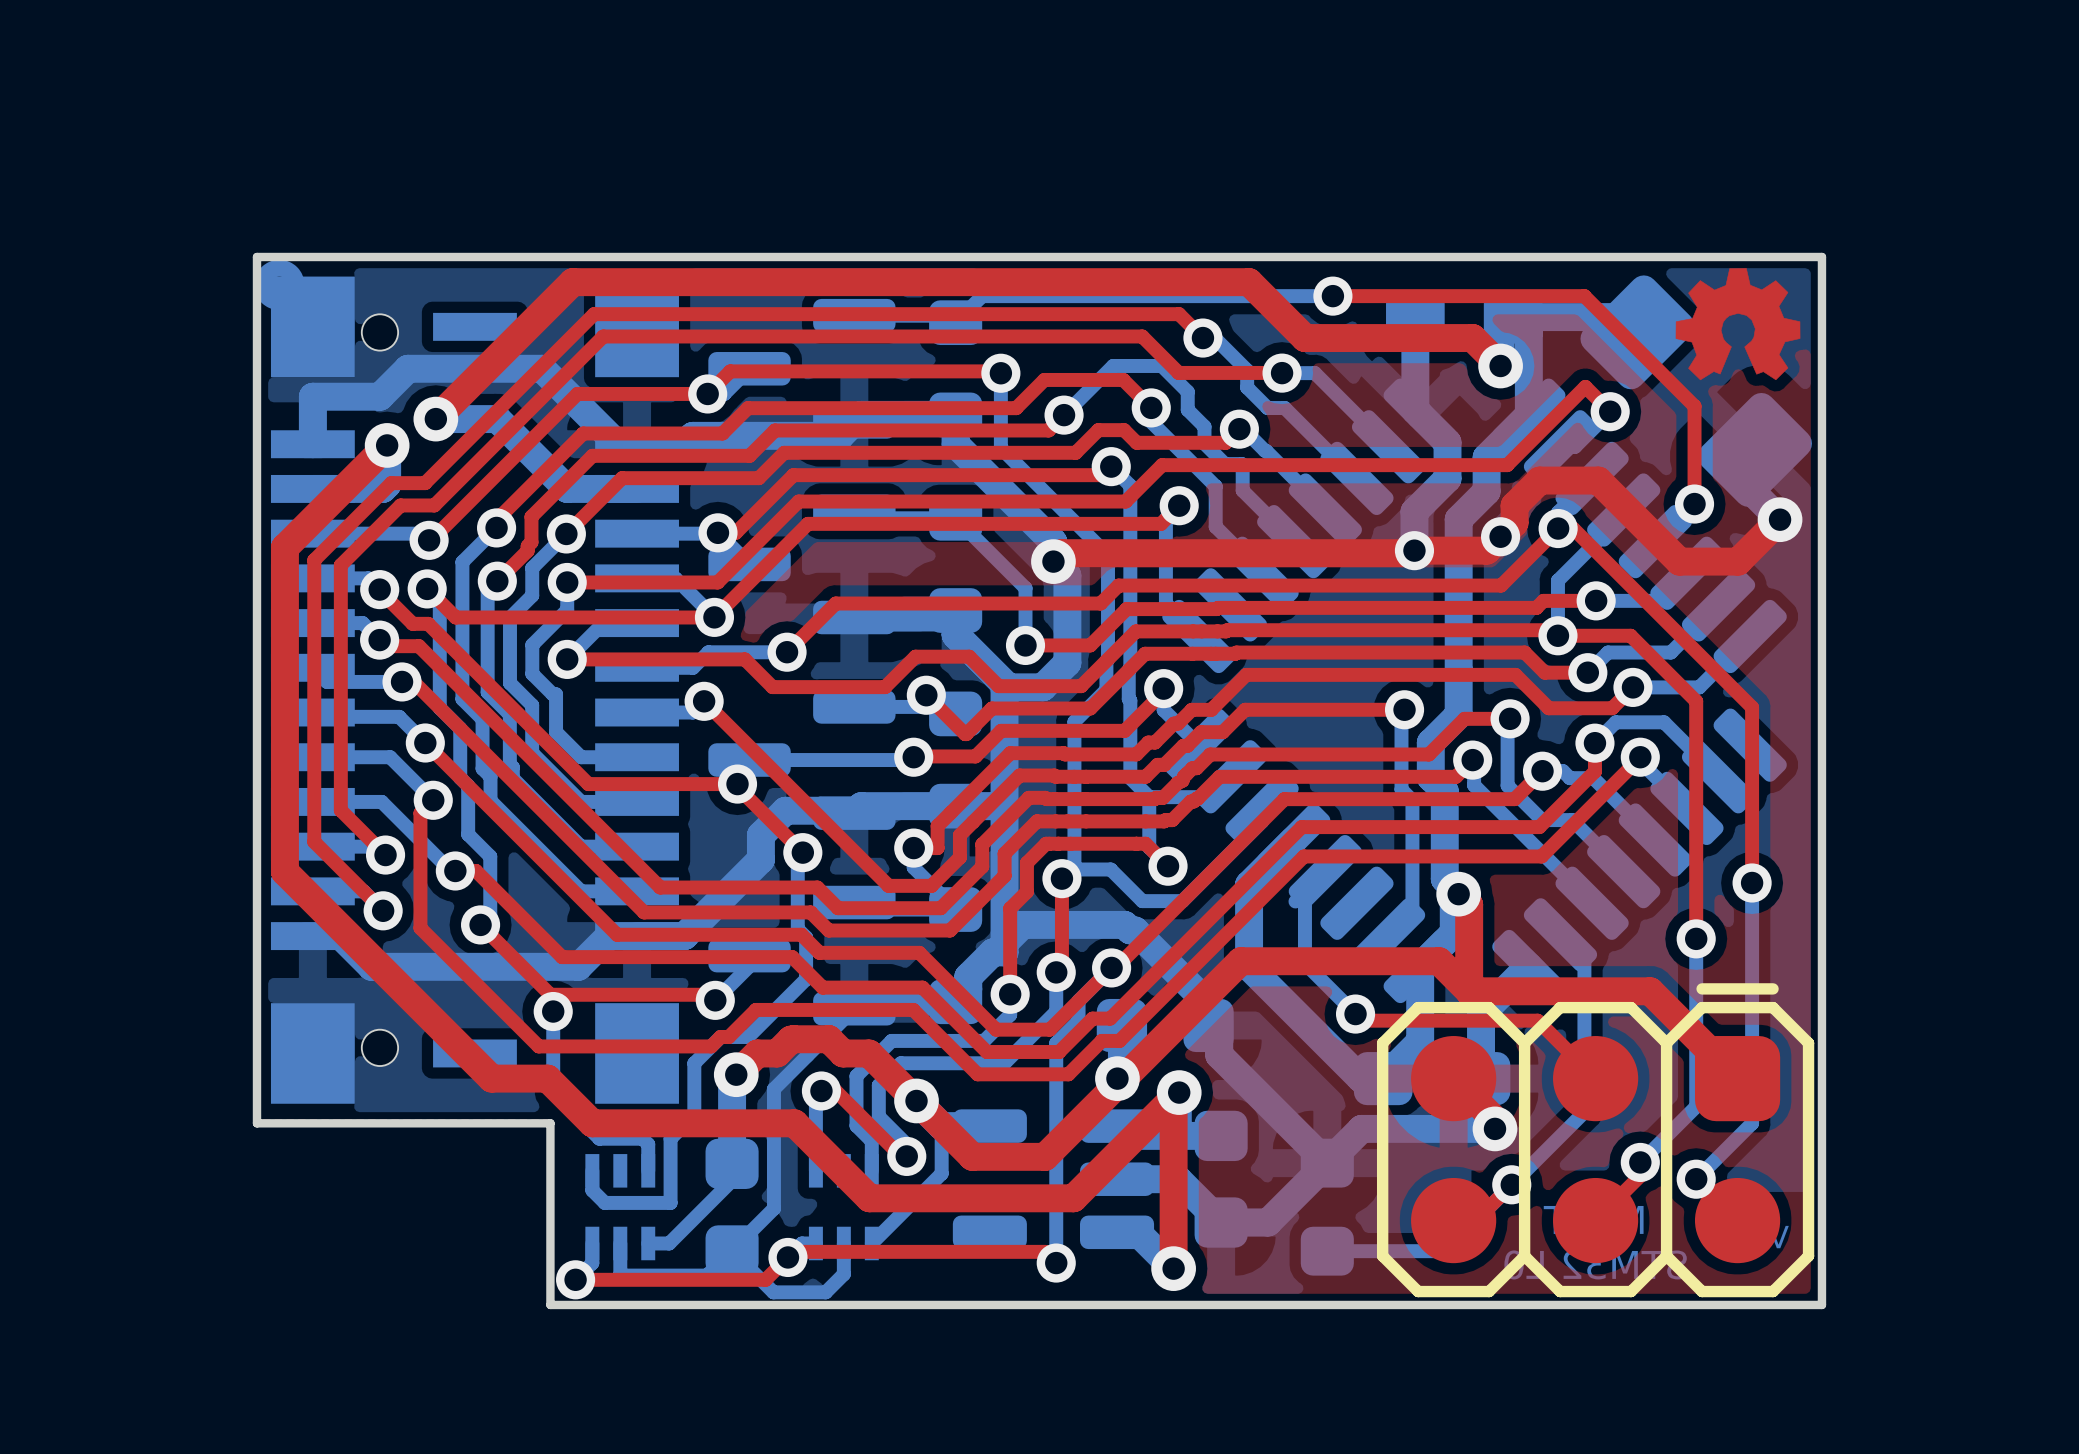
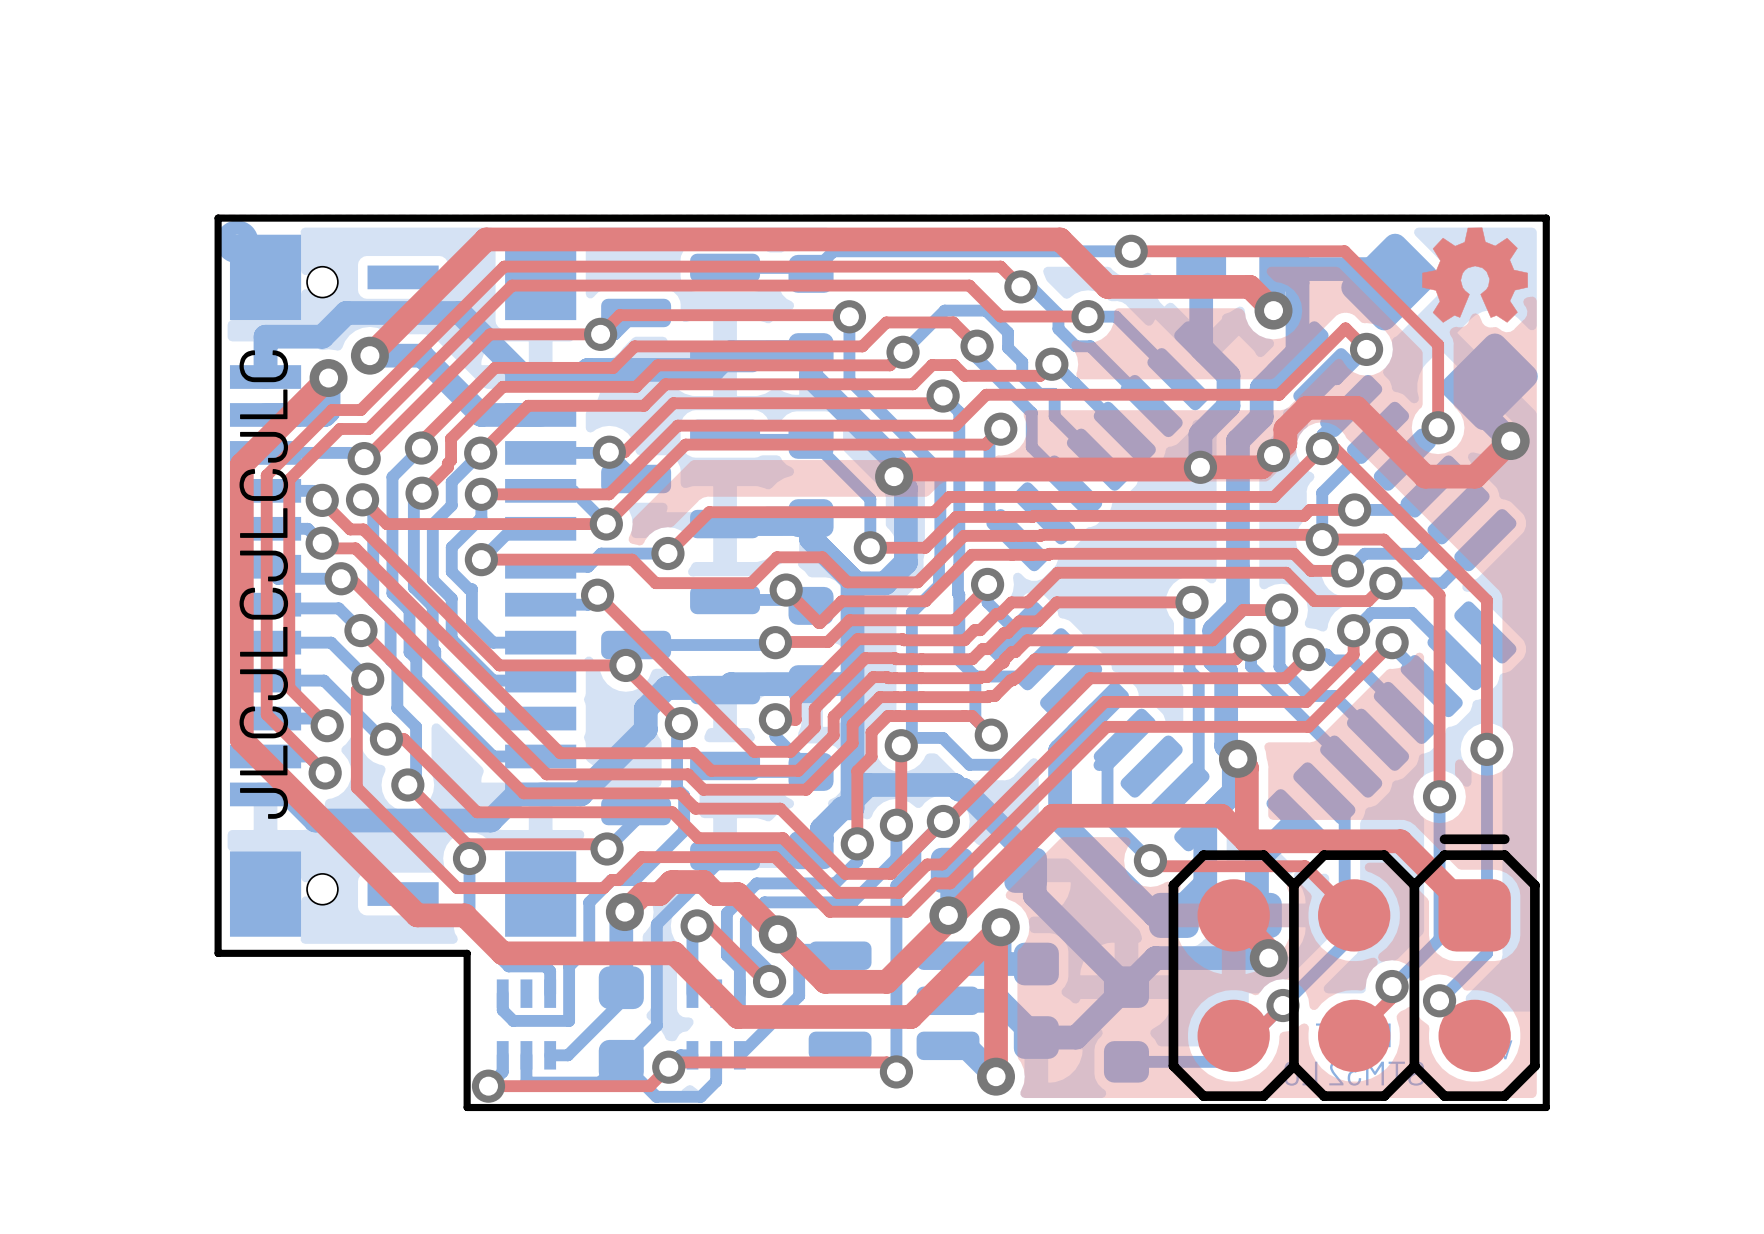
text: none -> JLCJLCJLCJLC (263, 584)

